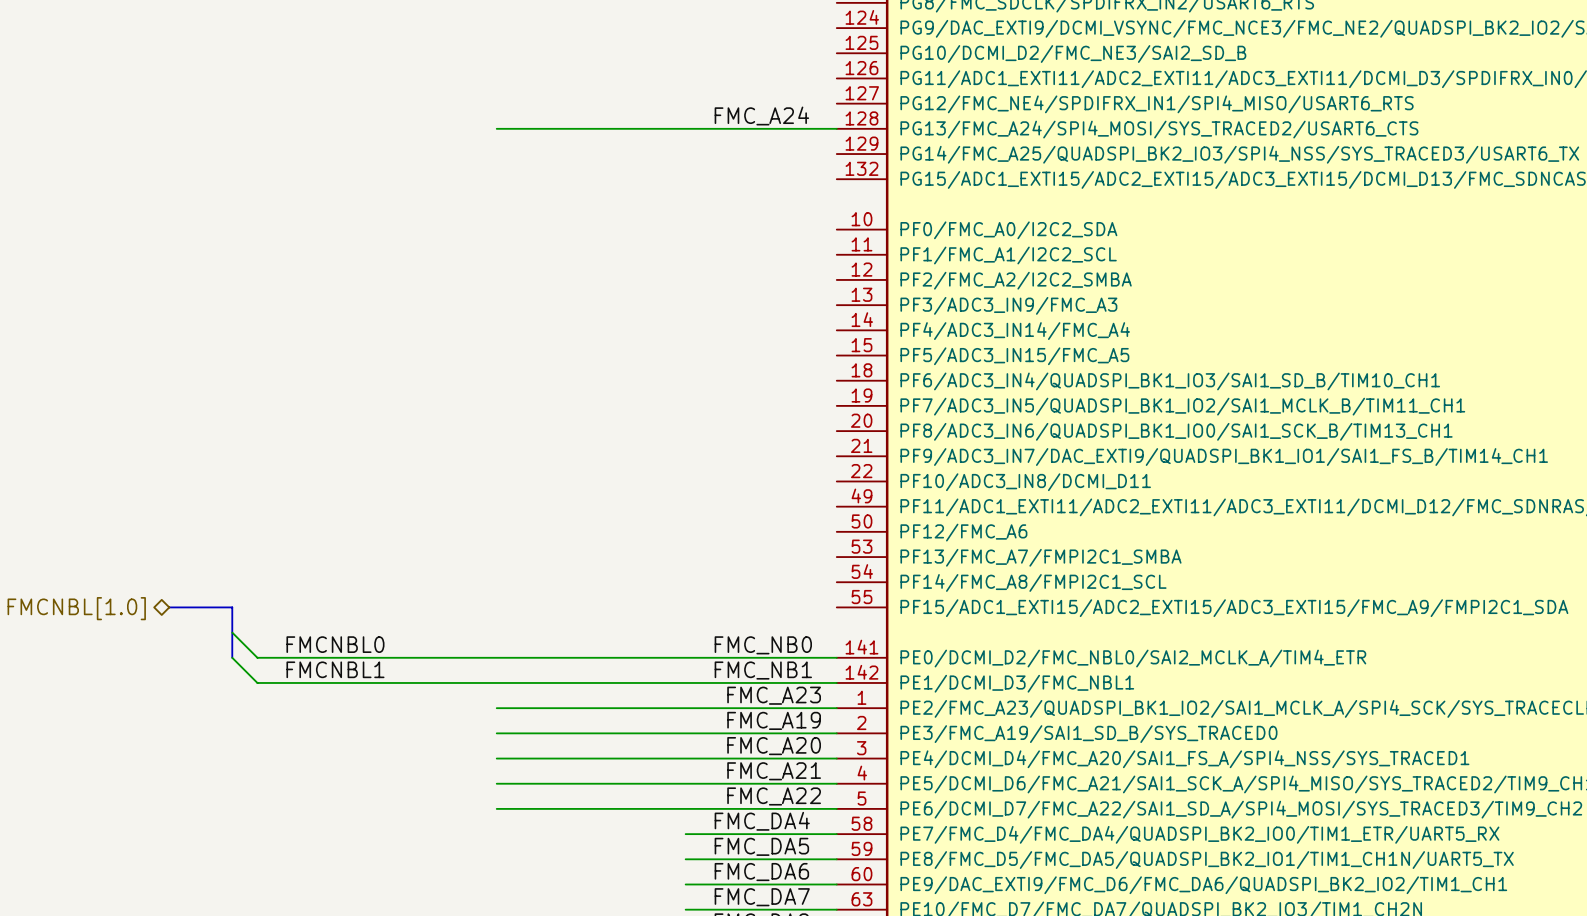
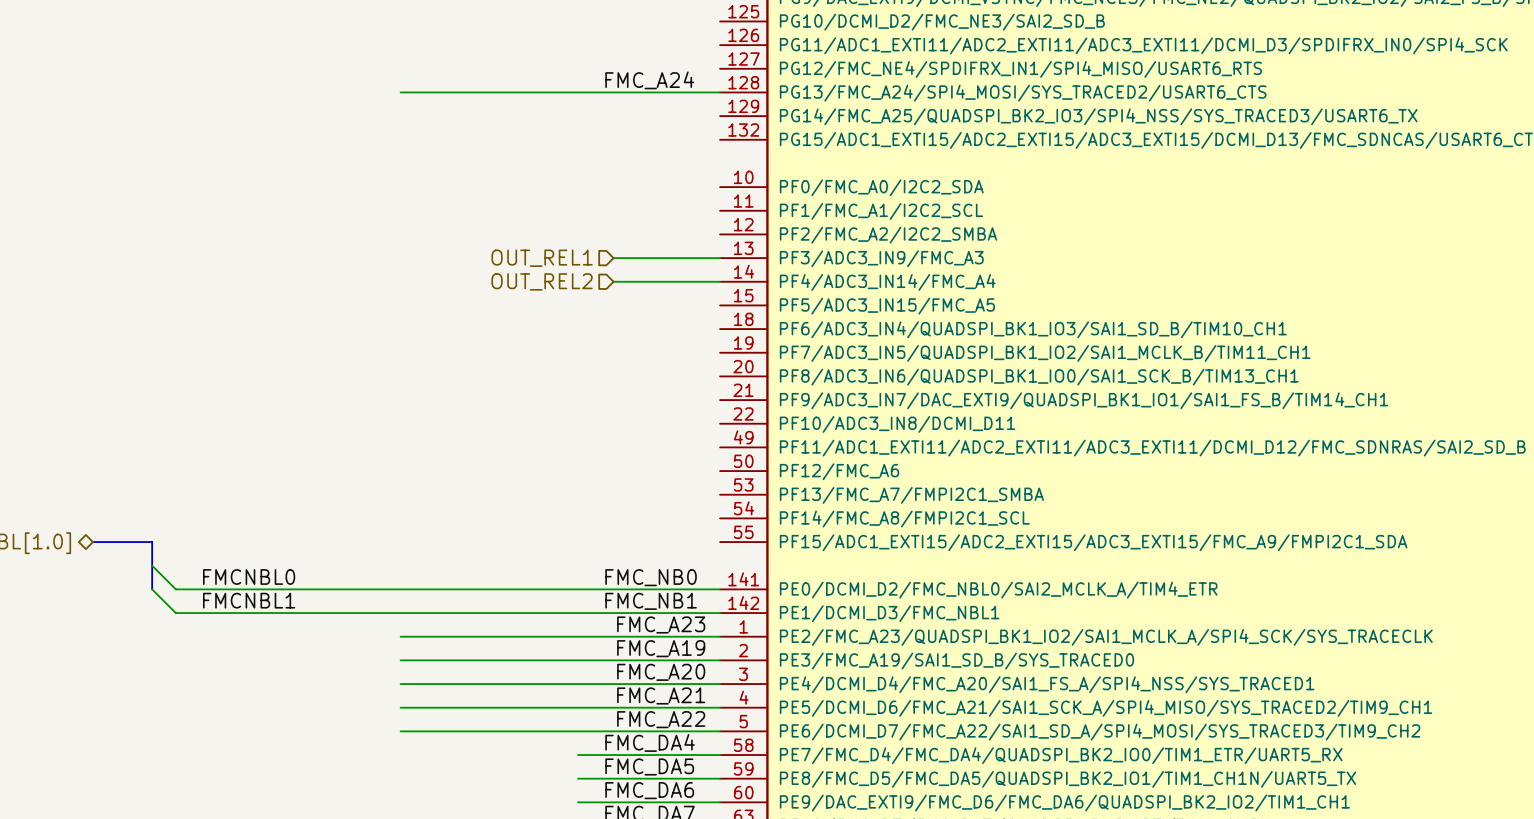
hierarchical label: none -> OUT_REL1 (542, 258)
wire: none -> (613, 258) (720, 258)
hierarchical label: none -> OUT_REL2 (542, 281)
wire: none -> (613, 281) (720, 281)

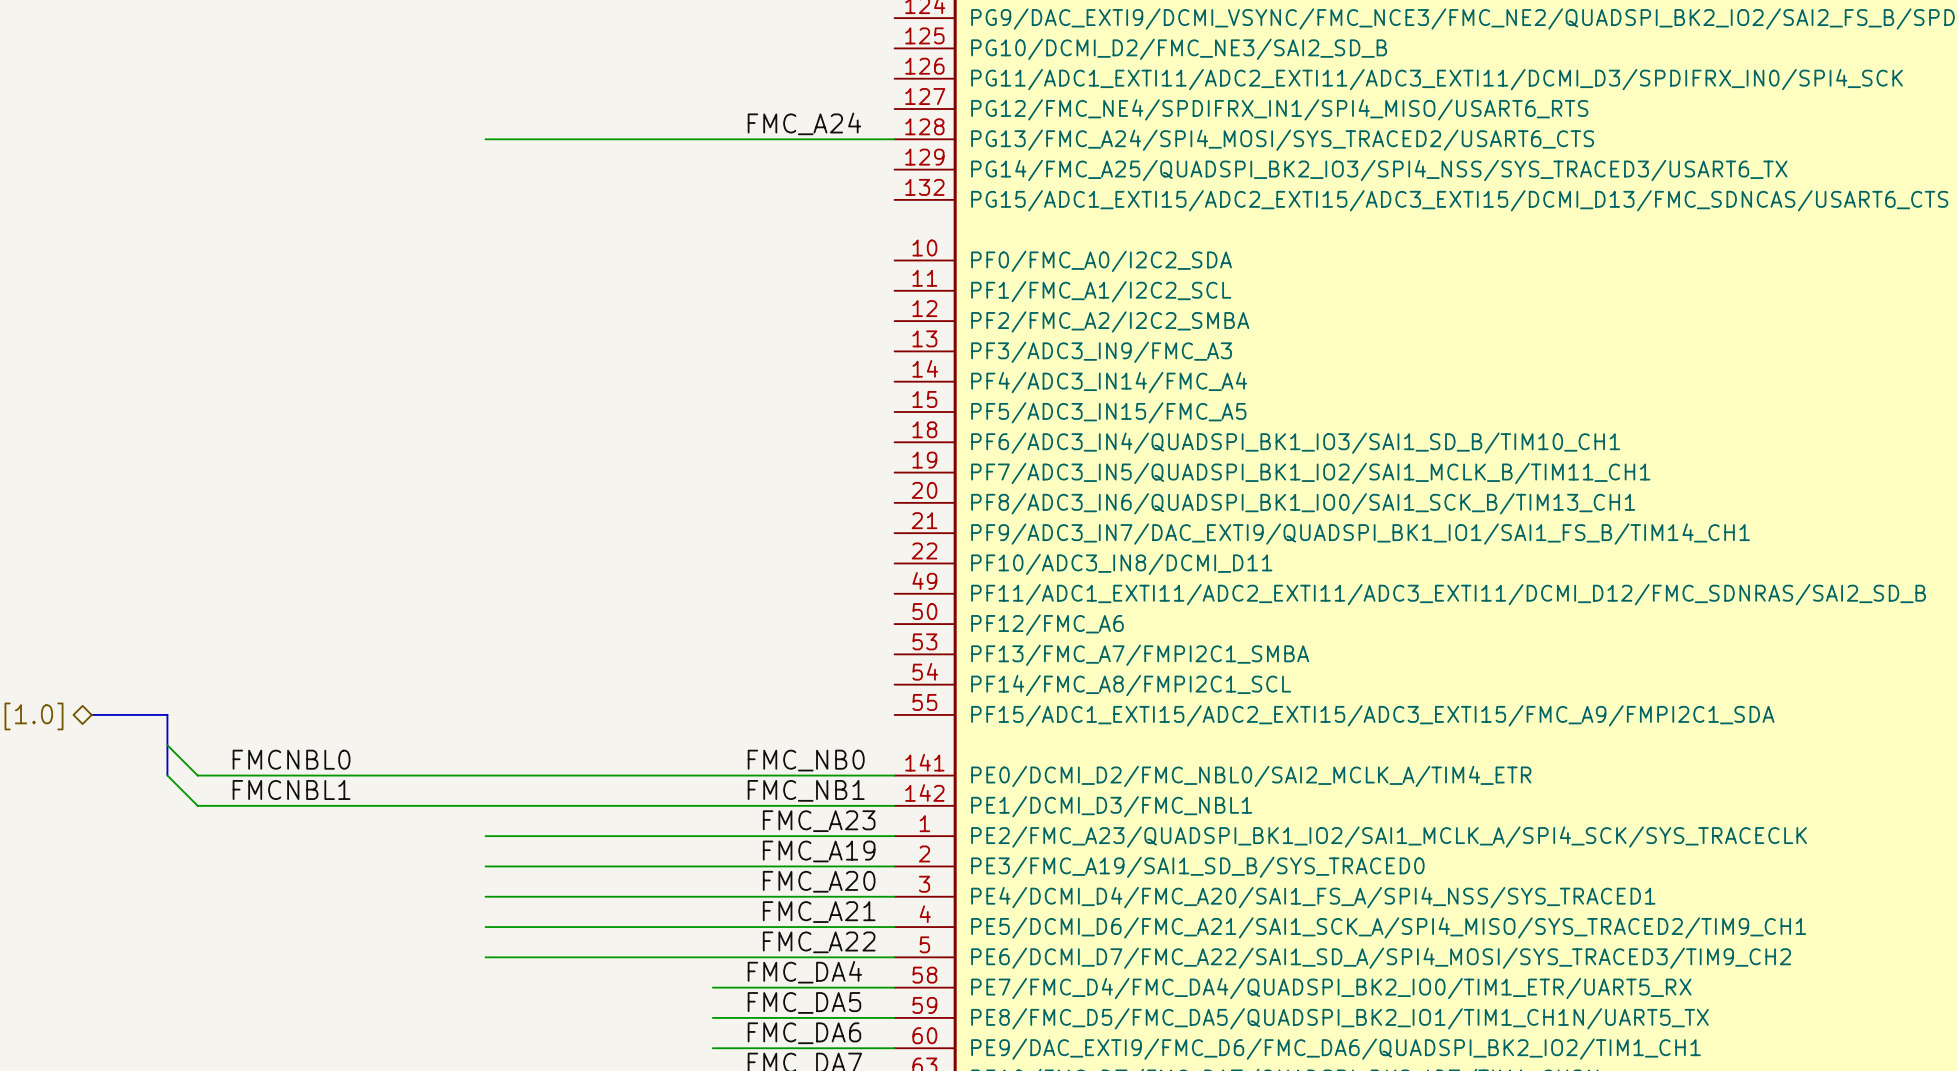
hierarchical label: OUT_REL1 (542, 258) -> none
wire: (613, 258) (720, 258) -> none
hierarchical label: OUT_REL2 (542, 281) -> none
wire: (613, 281) (720, 281) -> none

